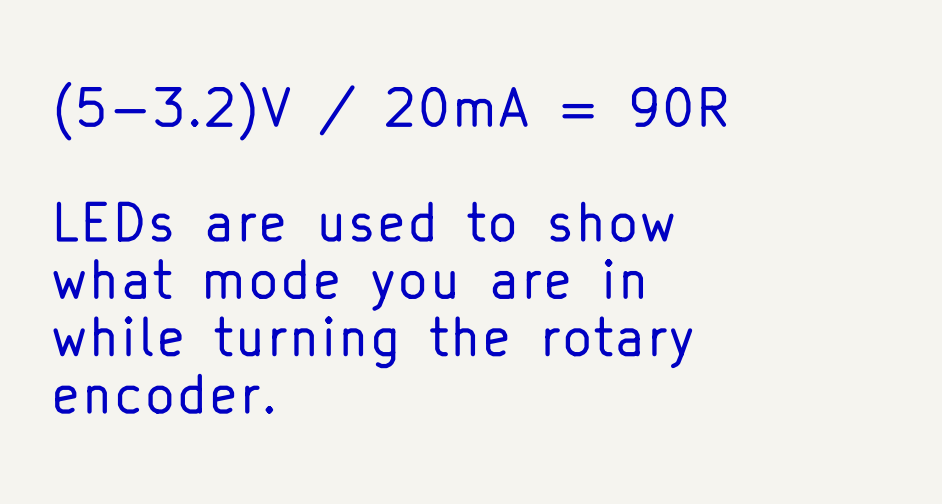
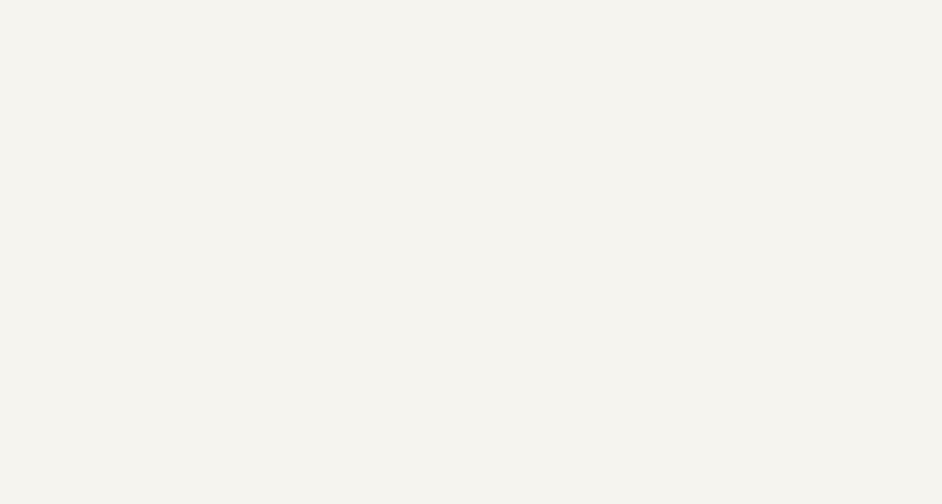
text: (5-3.2)V / 20mA = 90R (391, 111) -> none
text: LEDs are used to show (365, 221) -> none
text: what mode you are in (348, 284) -> none
text: while turning the rotary (372, 342) -> none
text: encoder. (164, 393) -> none

